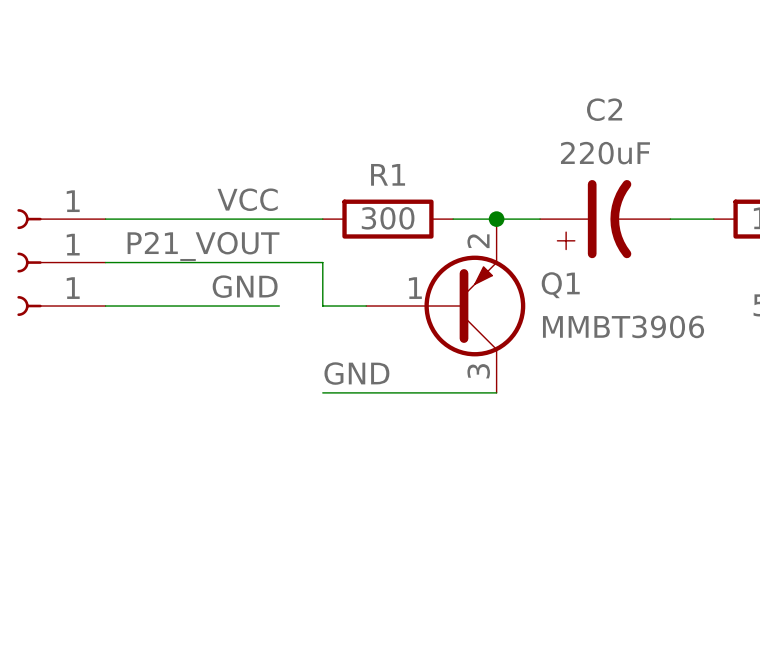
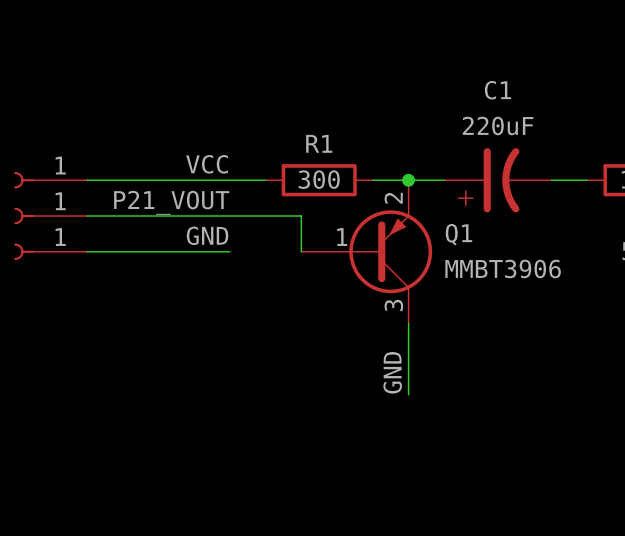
C2 name: C2 (604, 109) -> C1 (497, 90)
wire: (322, 262) (322, 306) (366, 306) -> (265, 216) (301, 216) (301, 251)
label rotation: 0° (356, 373) -> 90° counterclockwise (392, 372)
label position: GND (356, 373) -> GND (392, 372)
wire: (322, 392) (496, 392) -> (408, 394) (408, 323)

